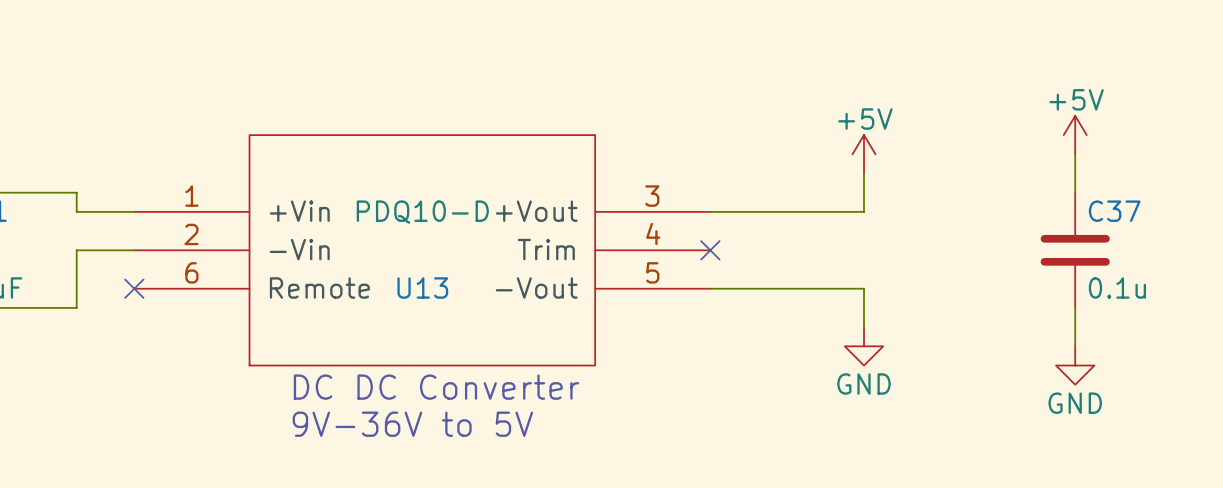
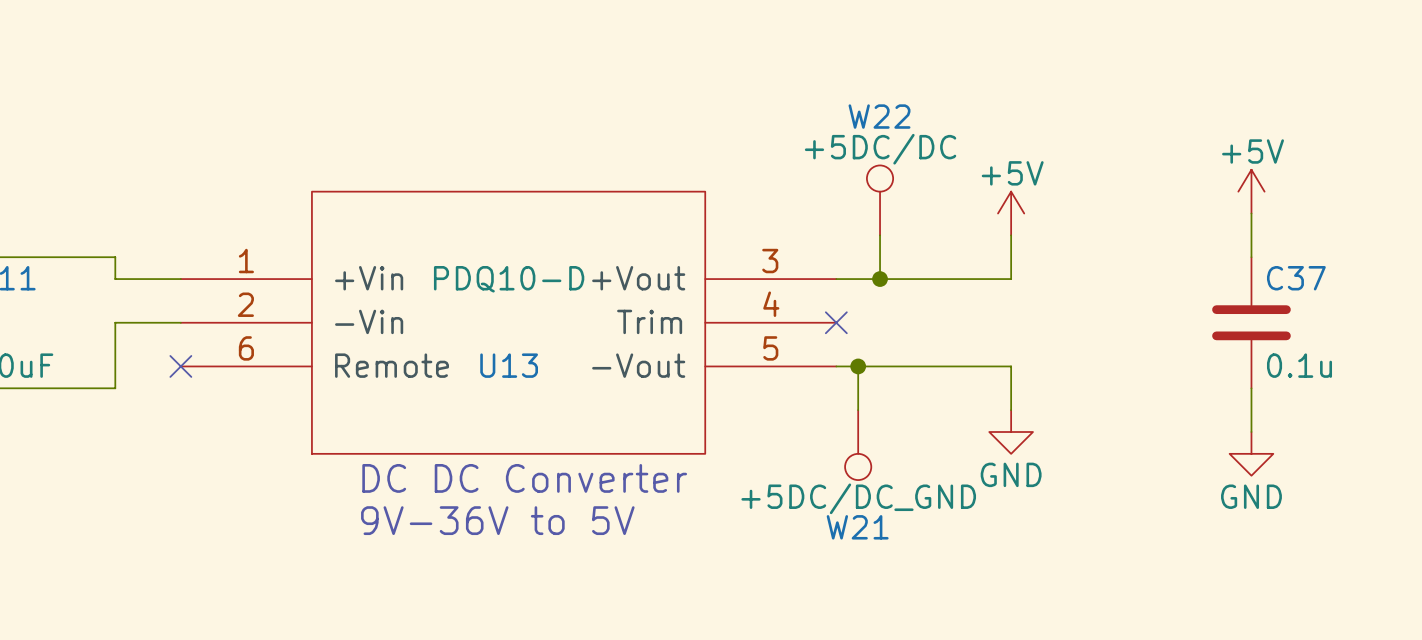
W22: none -> +5DC/DC (880, 200)
wire: none -> (880, 235) (880, 279)
junction: none -> (880, 279)
wire: none -> (858, 366) (858, 410)
junction: none -> (858, 366)
W21: none -> +5DC/DC_GND (858, 445)

